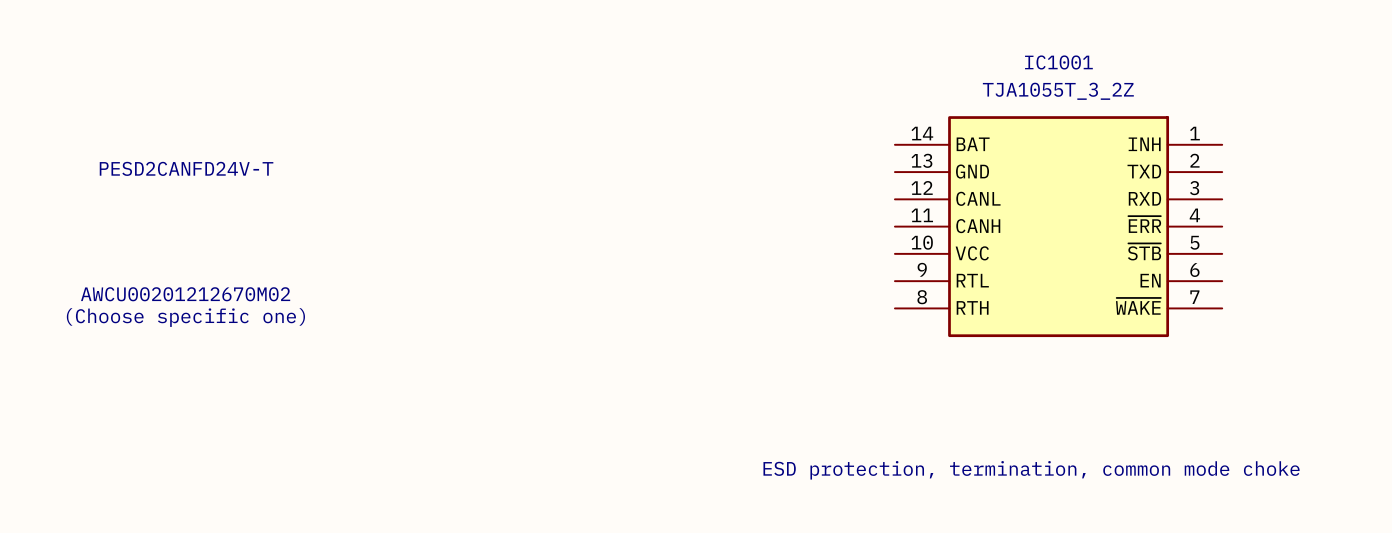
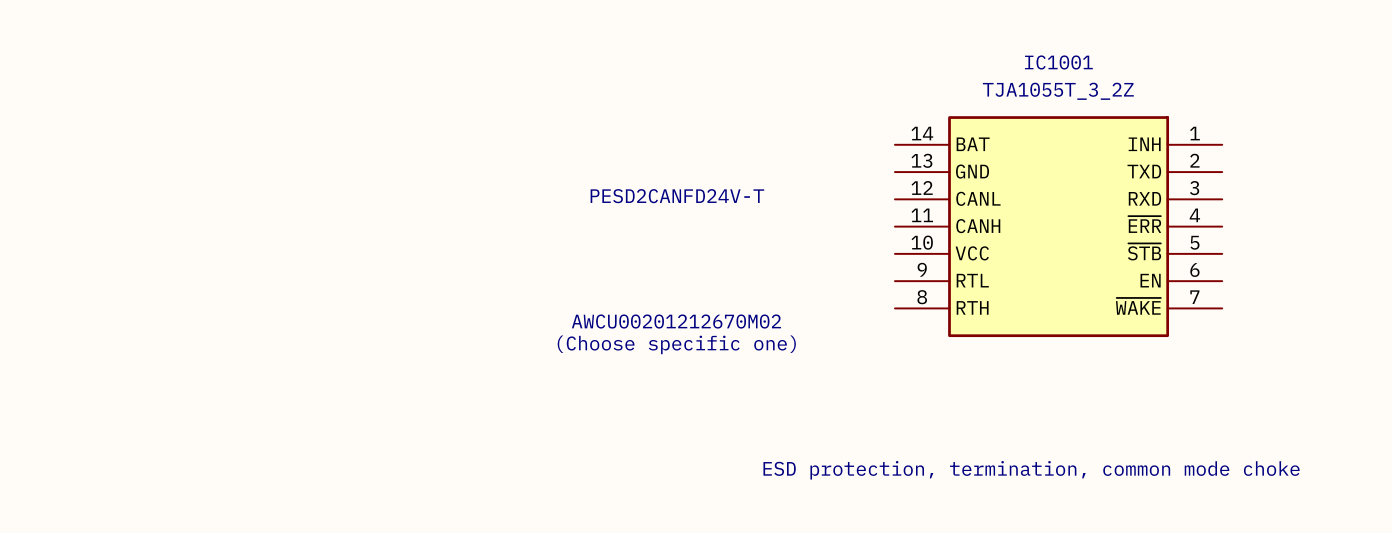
text: PESD2CANFD24V-T (186, 168) -> none
text: none -> PESD2CANFD24V-T (677, 196)
text: AWCU00201212670M02 (185, 294) -> none
text: (Choose specific one) (185, 317) -> none
text: none -> AWCU00201212670M02 (676, 321)
text: none -> (Choose specific one) (676, 344)

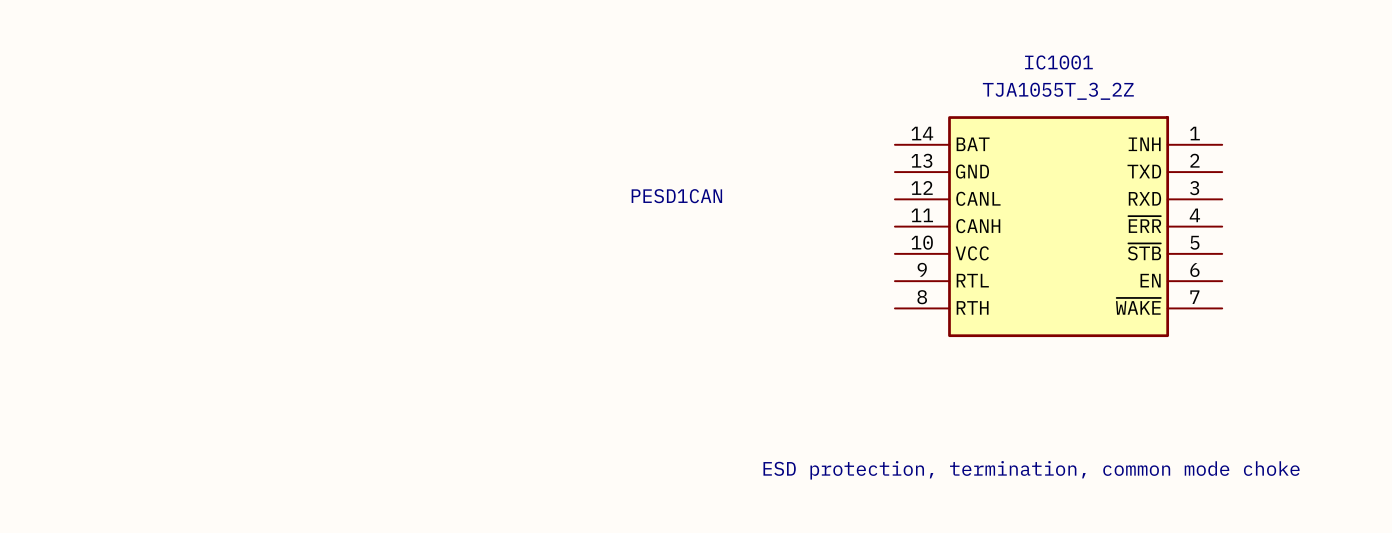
text: PESD2CANFD24V-T (677, 196) -> PESD1CAN (676, 196)
text: AWCU00201212670M02 (676, 321) -> none
text: (Choose specific one) (676, 344) -> none

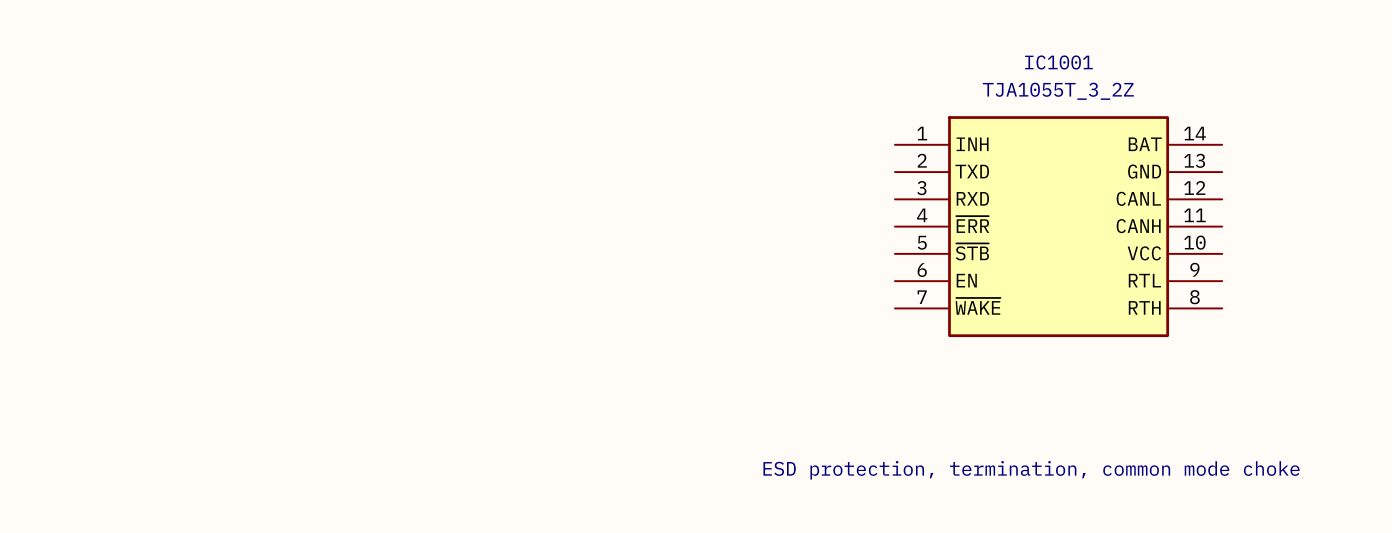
text: PESD1CAN (676, 196) -> none
IC1001 flip: as is (1058, 226) -> left-right (1058, 226)

